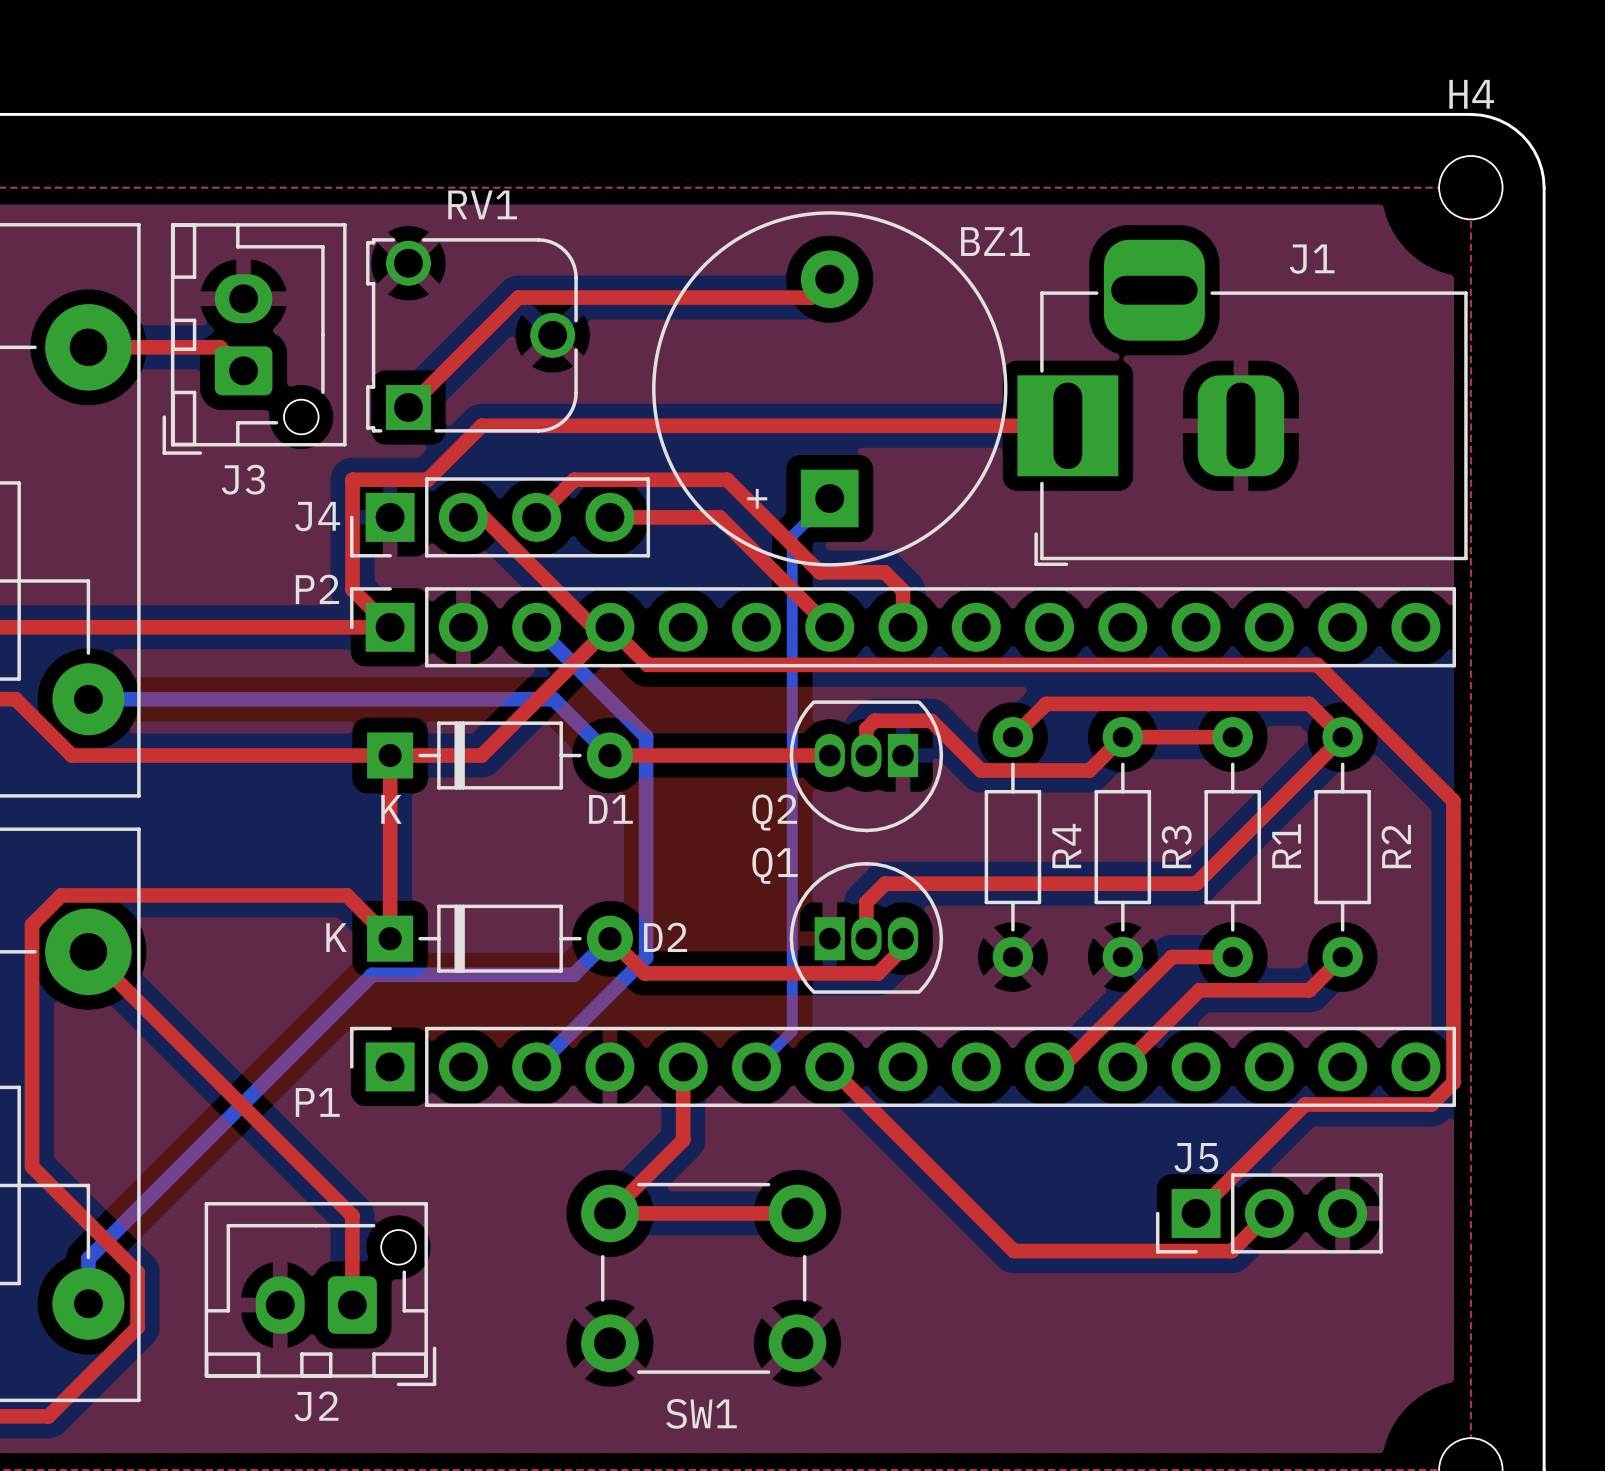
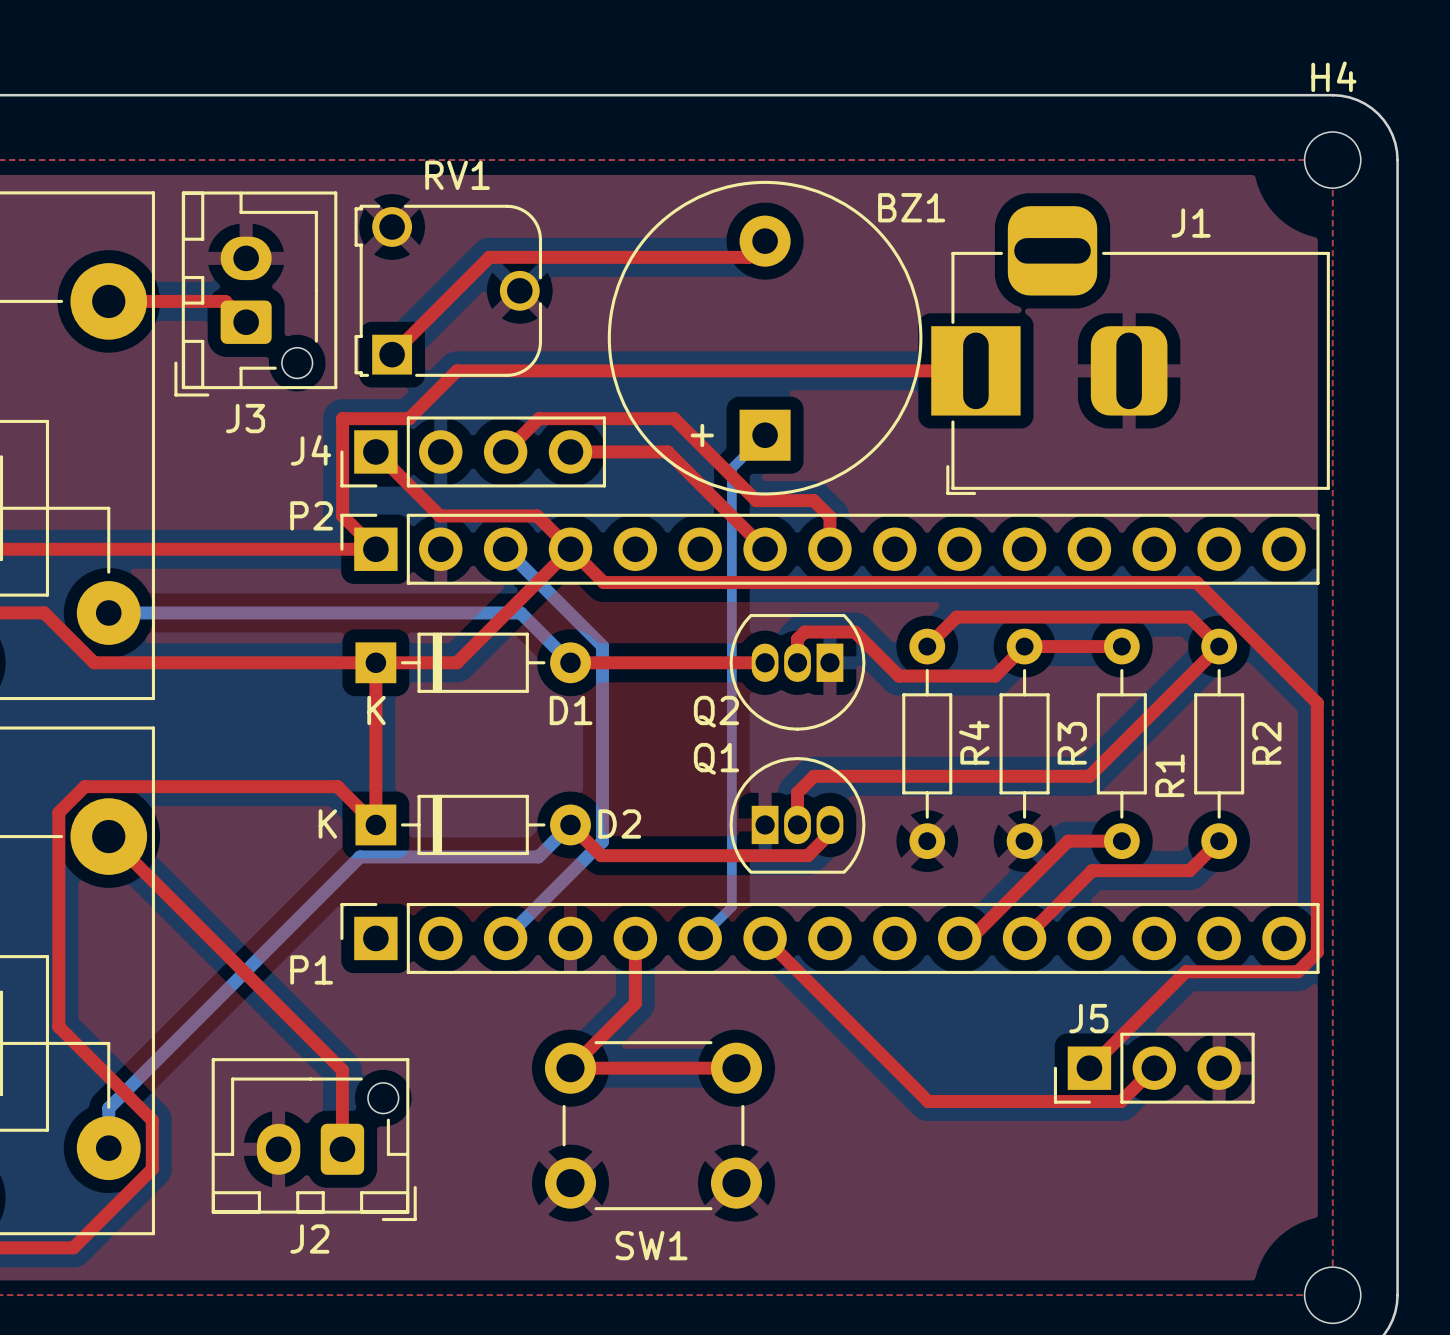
top track: (463, 517) (483, 517) (593, 627) (609, 627) -> (375, 451) (439, 515) (537, 515) (570, 549)
R1 name position: R1 (1286, 846) -> R1 (1169, 775)

